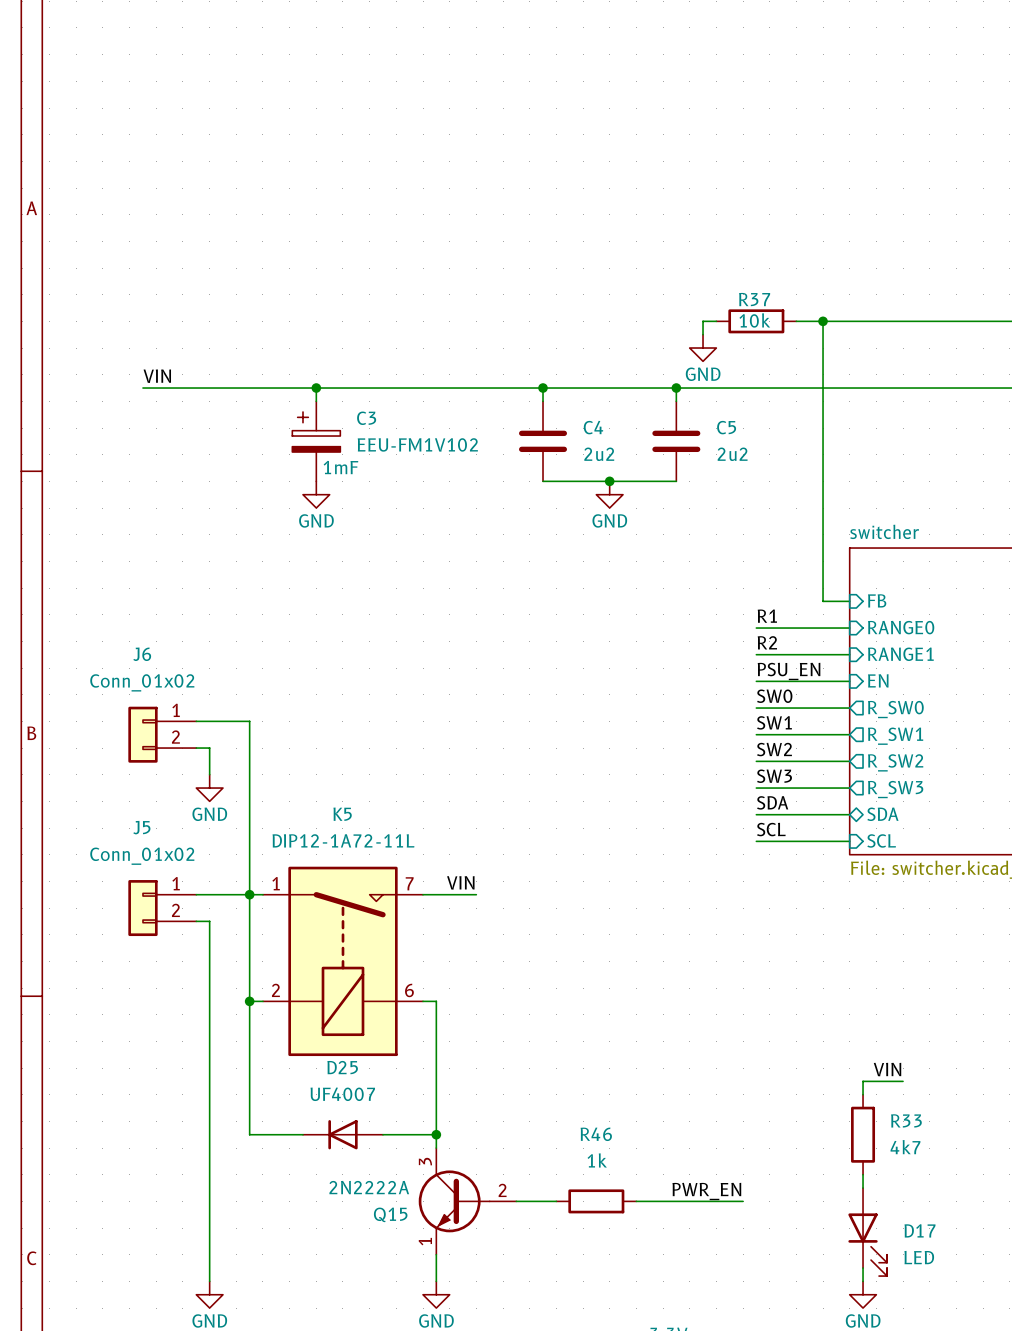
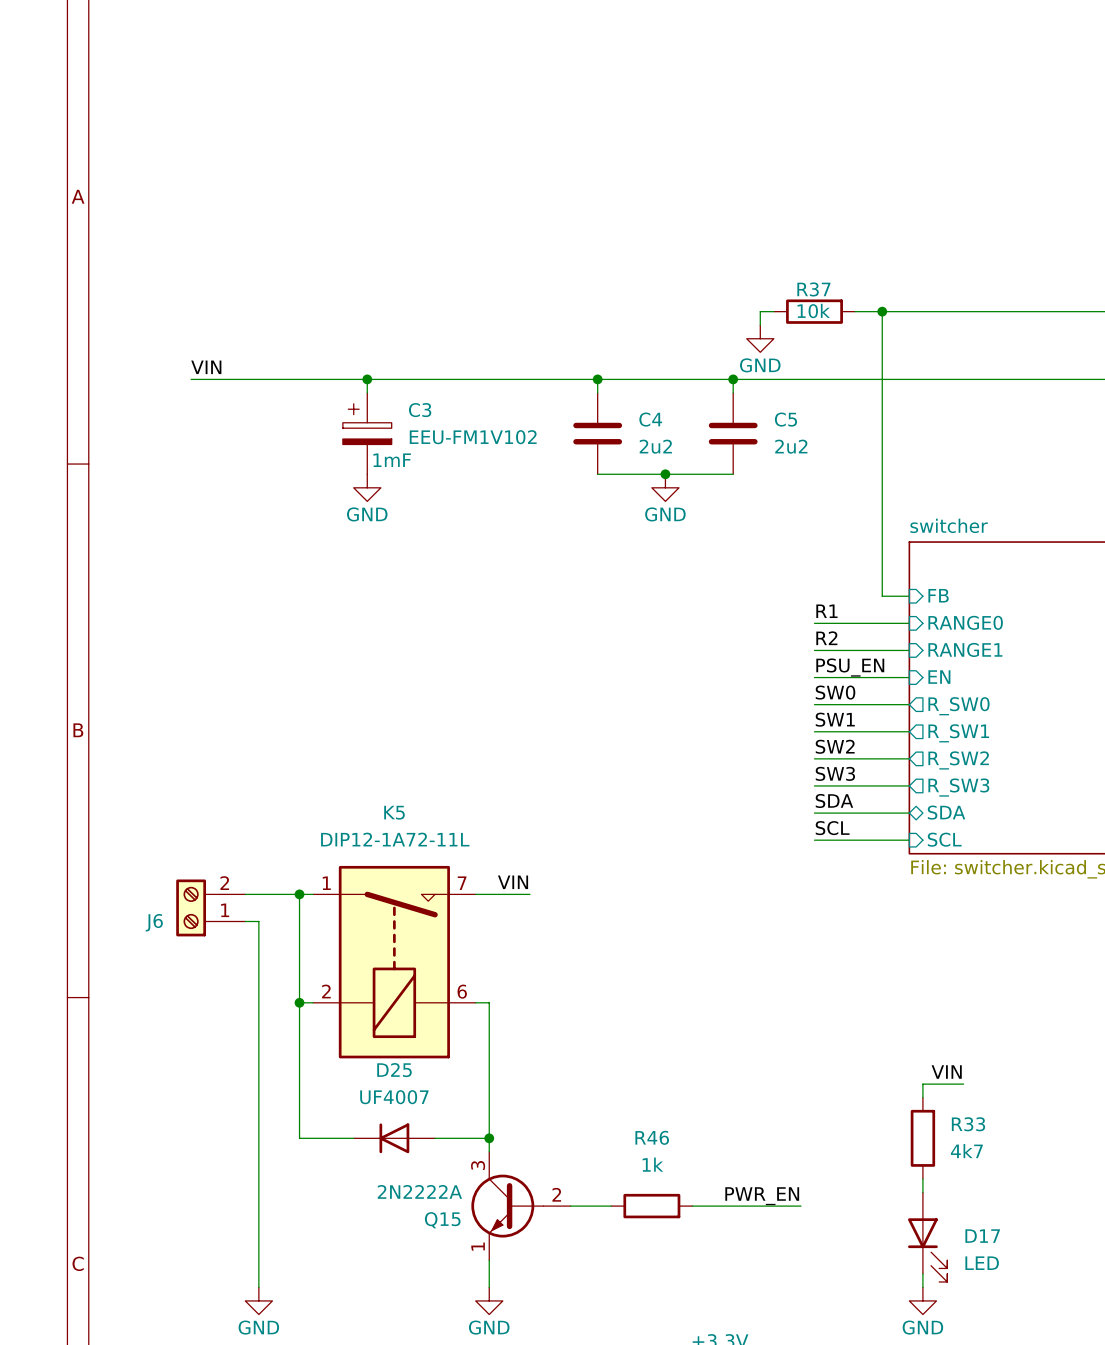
J6 name position: J6 (142, 654) -> J6 (154, 922)
J6 value: Conn_01x02 (142, 682) -> none
J6 symbol: [128, 706, 197, 763] -> [176, 879, 246, 937]
wire: (196, 721) (249, 721) (249, 894) -> none
wire: (196, 748) (209, 748) (209, 774) -> none
power symbol: GND (209, 788) -> none
J5: Conn_01x02 (162, 908) -> none

